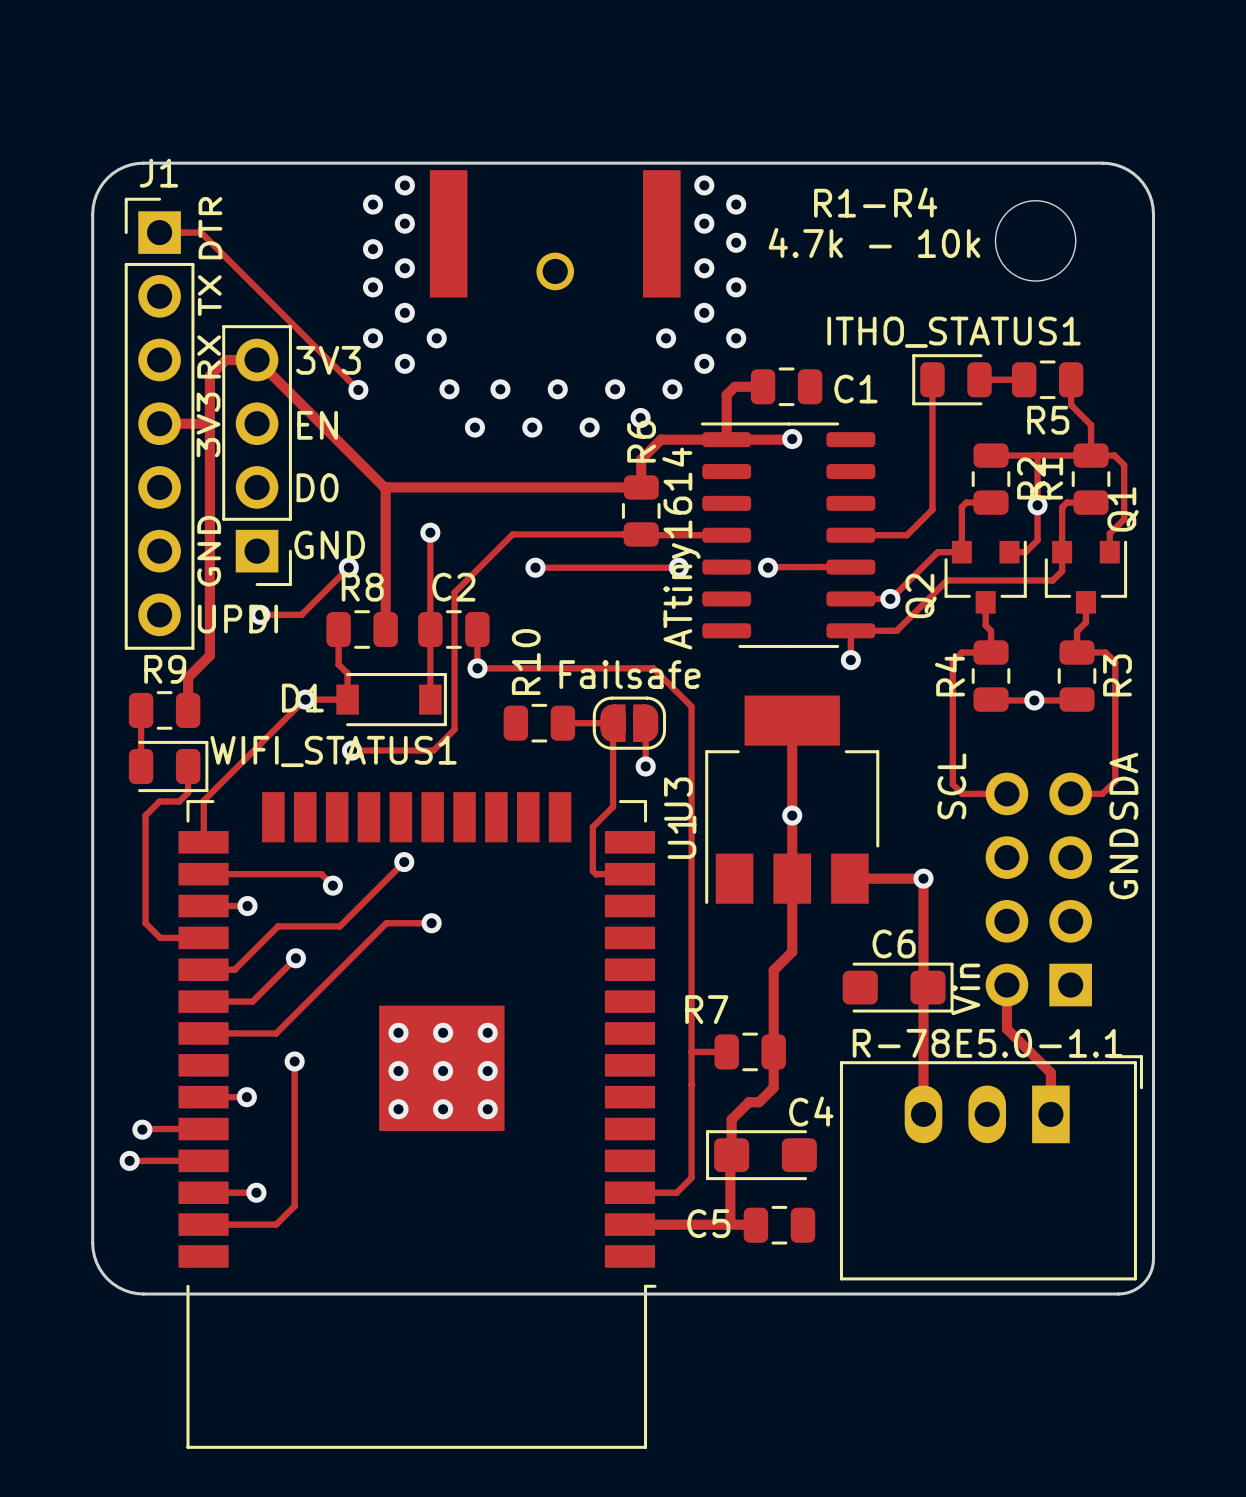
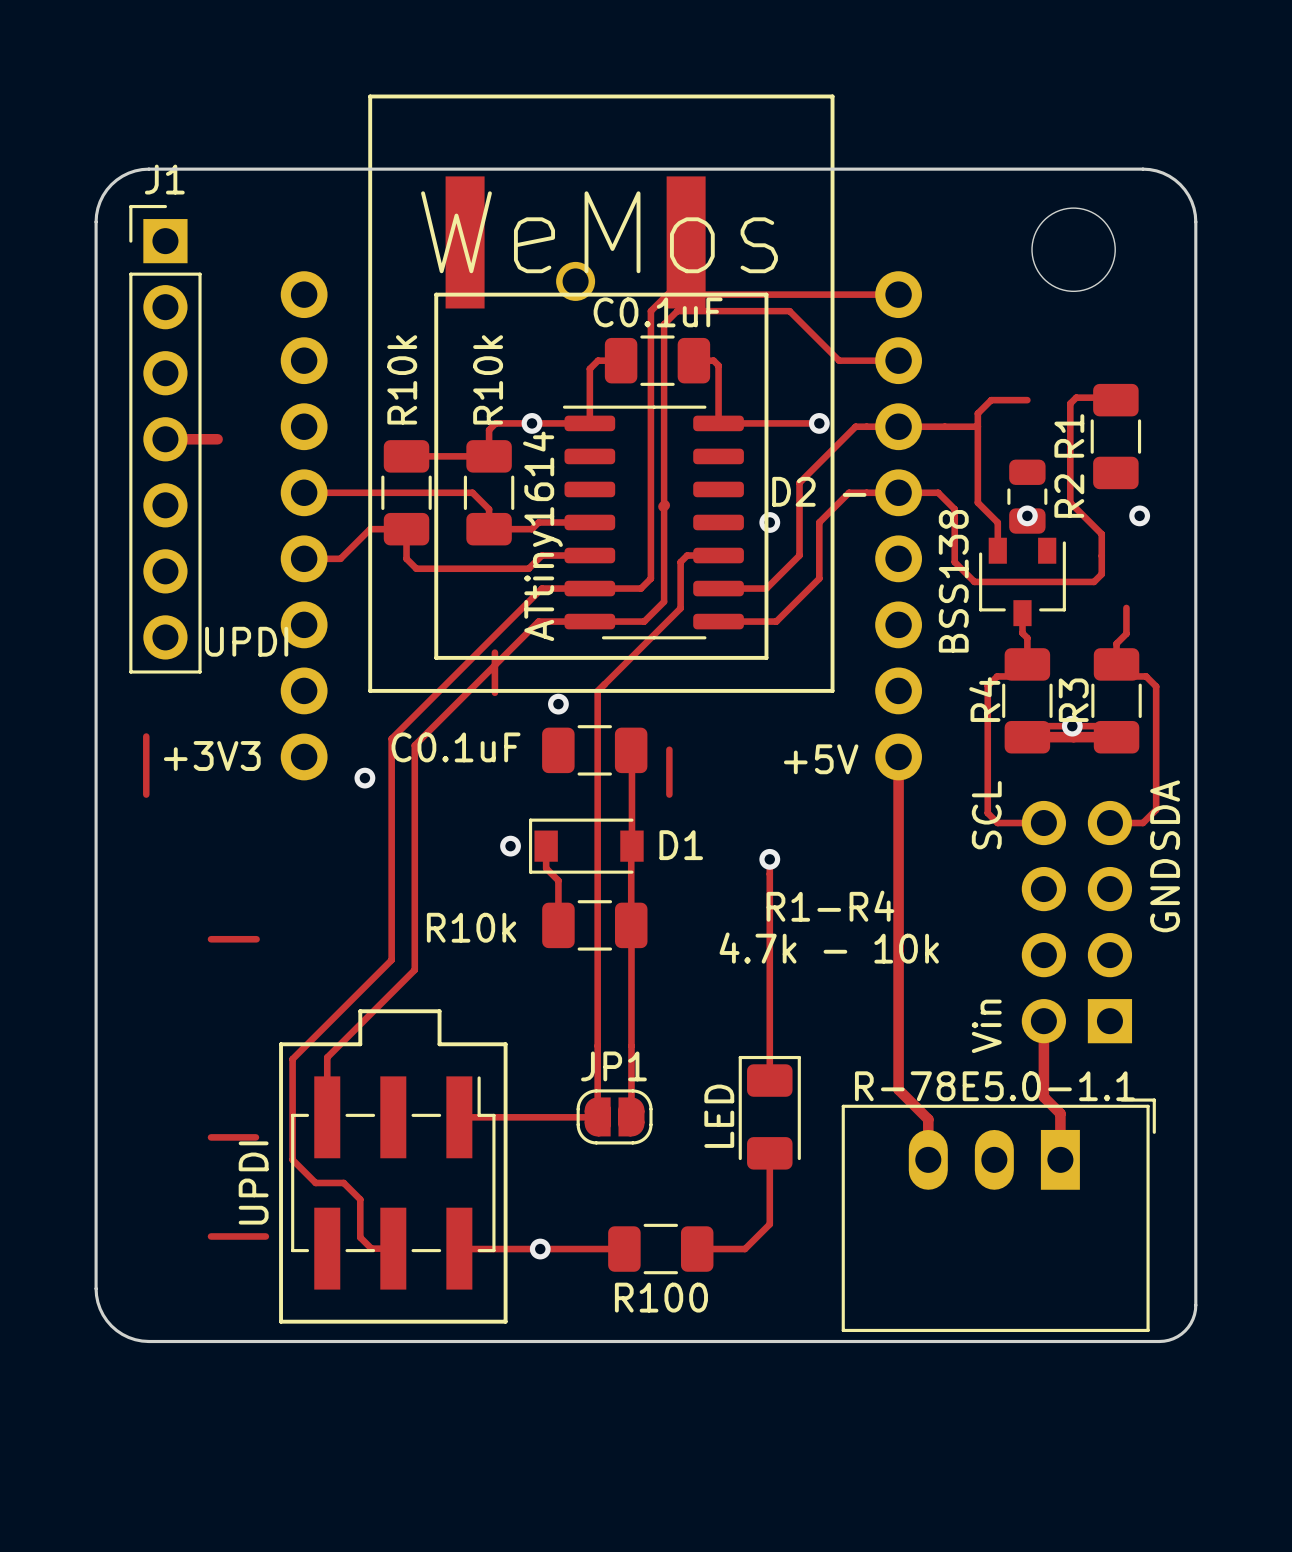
via: (404, 185) -> none
via: (704, 185) -> none
text: R1-R4 (875, 202) -> none
via: (373, 204) -> none
via: (736, 204) -> none
via: (404, 223) -> none
via: (704, 223) -> none
text: DTR (210, 228) -> none
track: (187, 232) (159, 232) (201, 232) (358, 389) -> none
via: (736, 242) -> none
text: 4.7k - 10k (874, 242) -> none
via: (373, 249) -> none
via: (404, 268) -> none
via: (704, 268) -> none
via: (373, 287) -> none
via: (736, 287) -> none
text: TX (209, 295) -> none
via: (404, 312) -> none
via: (704, 312) -> none
via: (373, 338) -> none
via: (436, 338) -> none
via: (666, 338) -> none
via: (736, 338) -> none
track: none -> (621, 360) (598, 360) (589, 368) (589, 423) (495, 423) (489, 430) (489, 456) (406, 456)
C0.1uF: none -> (657, 360)
track: none -> (693, 360) (713, 360) (718, 365) (718, 423) (819, 423)
track: none -> (898, 360) (839, 360) (789, 311) (677, 311) (664, 324) (664, 601) (644, 621) (538, 621) (414, 745) (414, 969) (327, 1057) (327, 1117)
text: RX (209, 356) -> none
text: 3V3 (328, 360) -> none
via: (404, 363) -> none
via: (704, 363) -> none
track: (932, 379) (932, 509) (906, 535) (850, 535) -> none
ITHO_STATUS1: (951, 379) -> none
track: (979, 379) (1024, 379) -> none
R5: (1047, 379) -> none
track: (1071, 379) (1071, 405) (1091, 425) (1091, 455) -> none
track: none -> (1115, 397) (1076, 397) (1070, 403) (1070, 502) (1101, 534) (1101, 574) (1094, 581) (974, 581) (954, 562) (954, 509) (938, 492) (849, 492) (819, 522) (819, 578) (776, 621) (718, 621)
track: none -> (1027, 400) (991, 400) (977, 413) (977, 502) (997, 522) (997, 555)
track: (763, 386) (734, 386) (726, 394) (726, 439) -> none
C1: (786, 386) -> none
via: (358, 389) -> none
via: (449, 389) -> none
via: (500, 389) -> none
via: (557, 389) -> none
via: (615, 389) -> none
via: (672, 389) -> none
via: none -> (532, 423)
track: none -> (977, 426) (855, 426) (799, 482) (799, 555) (766, 588) (718, 588)
via: (640, 417) -> none
part: none -> (601, 437)
text: 3V3 (208, 424) -> none
text: EN (317, 425) -> none
via: (474, 427) -> none
via: (532, 427) -> none
via: (589, 427) -> none
track: (792, 439) (661, 439) (641, 459) (641, 487) (388, 487) (385, 489) -> none
via position: (792, 439) -> (819, 423)
R1 footprint: [1071, 443, 1111, 515] -> [1090, 383, 1142, 490]
part: (257, 455) -> none
track: (991, 455) (1114, 455) (1124, 465) (1124, 519) (1109, 533) (1109, 552) -> none
track: (1037, 455) (1037, 540) (1025, 552) (1009, 552) -> none
text: none -> D2 - (819, 491)
track: none -> (304, 492) (472, 492) (489, 509) (489, 529) (531, 529) (538, 522) (589, 522)
R10k: none -> (406, 492)
R10k: none -> (489, 492)
text: D0 (317, 487) -> none
via: none -> (1027, 515)
via: none -> (1139, 515)
track: (991, 502) (966, 502) (961, 507) (961, 552) (937, 552) (891, 598) (850, 598) -> none
track: (1091, 502) (1066, 502) (1062, 507) (1062, 571) (1052, 580) (947, 580) (896, 630) (850, 630) (850, 660) -> none
via: none -> (769, 522)
via: (1037, 505) -> none
R6: (641, 510) -> none
track: (430, 532) (430, 699) -> none
via: (430, 532) -> none
track: none -> (589, 555) (541, 555) (528, 568) (416, 568) (406, 558) (406, 529) (370, 529) (340, 558) (304, 558)
track: none -> (718, 555) (687, 555) (680, 562) (680, 608) (597, 691) (597, 1116) (459, 1117)
track: (726, 535) (512, 534) (454, 592) (454, 729) (433, 750) (351, 750) -> none
ATtiny1614 position: (788, 535) -> (653, 522)
text: GND (329, 545) -> none
text: GND (209, 551) -> none
BSS138: none -> (1022, 581)
track: (348, 567) (301, 614) (260, 614) -> none
via: (348, 567) -> none
track: none -> (555, 588) (541, 588) (391, 738) (391, 960) (292, 1059) (292, 1159) (315, 1182) (343, 1182) (360, 1199) (360, 1237) (371, 1248) (393, 1248)
via: (535, 567) -> none
track: (618, 567) (678, 567) -> (640, 588) (650, 578) (650, 311) (667, 294) (898, 294)
via: (678, 567) -> none
via: (768, 567) -> none
track: (850, 567) (768, 567) -> none
Q2: (985, 577) -> none
Q1: (1085, 577) -> none
via: (890, 598) -> none
track: (985, 602) (985, 625) (991, 630) -> (1022, 607) (1022, 633) (1027, 638) (1027, 653)
track: (1085, 602) (1085, 622) (1077, 631) -> (1126, 607) (1126, 633) (1116, 643) (1116, 654)
via: (260, 614) -> none
track: (338, 629) (338, 664) (347, 673) (347, 699) (304, 699) (203, 800) (203, 842) -> none
R8: (362, 629) -> none
track: (385, 629) (385, 488) (257, 360) (225, 360) (209, 375) (209, 655) (188, 677) (188, 710) -> none
C2: (453, 629) -> none
R4 footprint: [971, 640, 1011, 712] -> [1002, 648, 1053, 754]
R3 footprint: [1057, 640, 1097, 712] -> [1091, 648, 1142, 754]
via: (850, 660) -> none
track: (477, 668) (653, 668) (691, 706) (691, 1177) (676, 1192) (629, 1192) -> none
via: (477, 668) -> none
R3 name position: R3 (1117, 675) -> R3 (1073, 700)
via: none -> (558, 704)
via: (305, 699) -> none
D1 rotation: 0° (391, 699) -> 180° (586, 846)
D1 position: (391, 699) -> (586, 846)
R9: (164, 710) -> none
track: none -> (1027, 737) (1116, 737)
track: (792, 720) (792, 951) (773, 970) (773, 1087) (759, 1102) (748, 1102) (731, 1119) (731, 1155) -> none
R10: (539, 723) -> none
track: (562, 723) (613, 723) (613, 806) (592, 827) (592, 870) (596, 874) (629, 874) -> none
C0.1uF: none -> (594, 750)
track: none -> (631, 750) (631, 925)
part: Failsafe (629, 723) -> none
text: none -> +3V3 (212, 755)
track: none -> (898, 756) (898, 1089) (928, 1119) (928, 1159)
text: none -> +5V (821, 759)
WIFI_STATUS1: (168, 766) -> none
track: (188, 766) (188, 792) (179, 801) (159, 801) (145, 815) (145, 923) (160, 937) (203, 937) -> none
via: (645, 766) -> none
U3: (792, 799) -> none
track: none -> (546, 845) (546, 868) (558, 880) (558, 925)
via position: (792, 815) -> (769, 859)
via: none -> (510, 846)
track: none -> (769, 859) (769, 1080)
track: (404, 862) (339, 926) (278, 926) (234, 969) (203, 969) -> none
via: (404, 862) -> none
track: (203, 874) (321, 874) (332, 885) -> none
text: none -> R1-R4 (830, 906)
track: (849, 878) (923, 878) (923, 1114) -> none
via: (923, 878) -> none
via: (332, 885) -> none
R10k: none -> (594, 925)
track: none -> (631, 925) (631, 1116)
via: (247, 906) -> none
text: none -> 4.7k - 10k (829, 948)
track: (431, 923) (386, 923) (276, 1033) (203, 1033) -> none
via: (431, 923) -> none
track: (295, 958) (252, 1001) (203, 1001) -> none
via: (295, 958) -> none
line: none -> (360, 1011) (360, 1044) (281, 1044) (281, 1321) (505, 1321) (505, 1044) (439, 1044) (439, 1011) (360, 1011)
C6: (898, 987) -> none
text position: Vin (965, 989) -> Vin (986, 1026)
track: (1006, 1028) (1050, 1072) (1050, 1114) -> (1043, 1066) (1043, 1097) (1060, 1113) (1060, 1159)
via: (398, 1032) -> none
via: (443, 1032) -> none
via: (487, 1032) -> none
track: (691, 1051) (726, 1051) -> none
R7: (750, 1051) -> none
track: (294, 1061) (294, 1206) (276, 1224) (203, 1224) -> none
via: (294, 1061) -> none
via: (398, 1071) -> none
via: (443, 1071) -> none
via: (487, 1071) -> none
LED: none -> (769, 1112)
JP1: none -> (614, 1116)
via: (246, 1097) -> none
via: (398, 1109) -> none
via: (443, 1109) -> none
via: (487, 1109) -> none
track: none -> (769, 1153) (769, 1224) (745, 1249) (697, 1249)
U1: (417, 1120) -> none
via: (142, 1129) -> none
track: (146, 1129) (142, 1129) (203, 1129) -> none
UPDI: none -> (393, 1182)
track: (730, 1155) (730, 1221) (727, 1224) -> none
C4: (761, 1155) -> none
track: (129, 1160) (203, 1160) -> none
via: (129, 1160) -> none
R-78E5.0-1.1 position: (991, 1167) -> (998, 1215)
via: (256, 1192) -> none
track: none -> (459, 1248) (624, 1249)
via: none -> (540, 1249)
R100: none -> (660, 1249)
track: (630, 1224) (755, 1225) -> none
C5: (779, 1225) -> none

